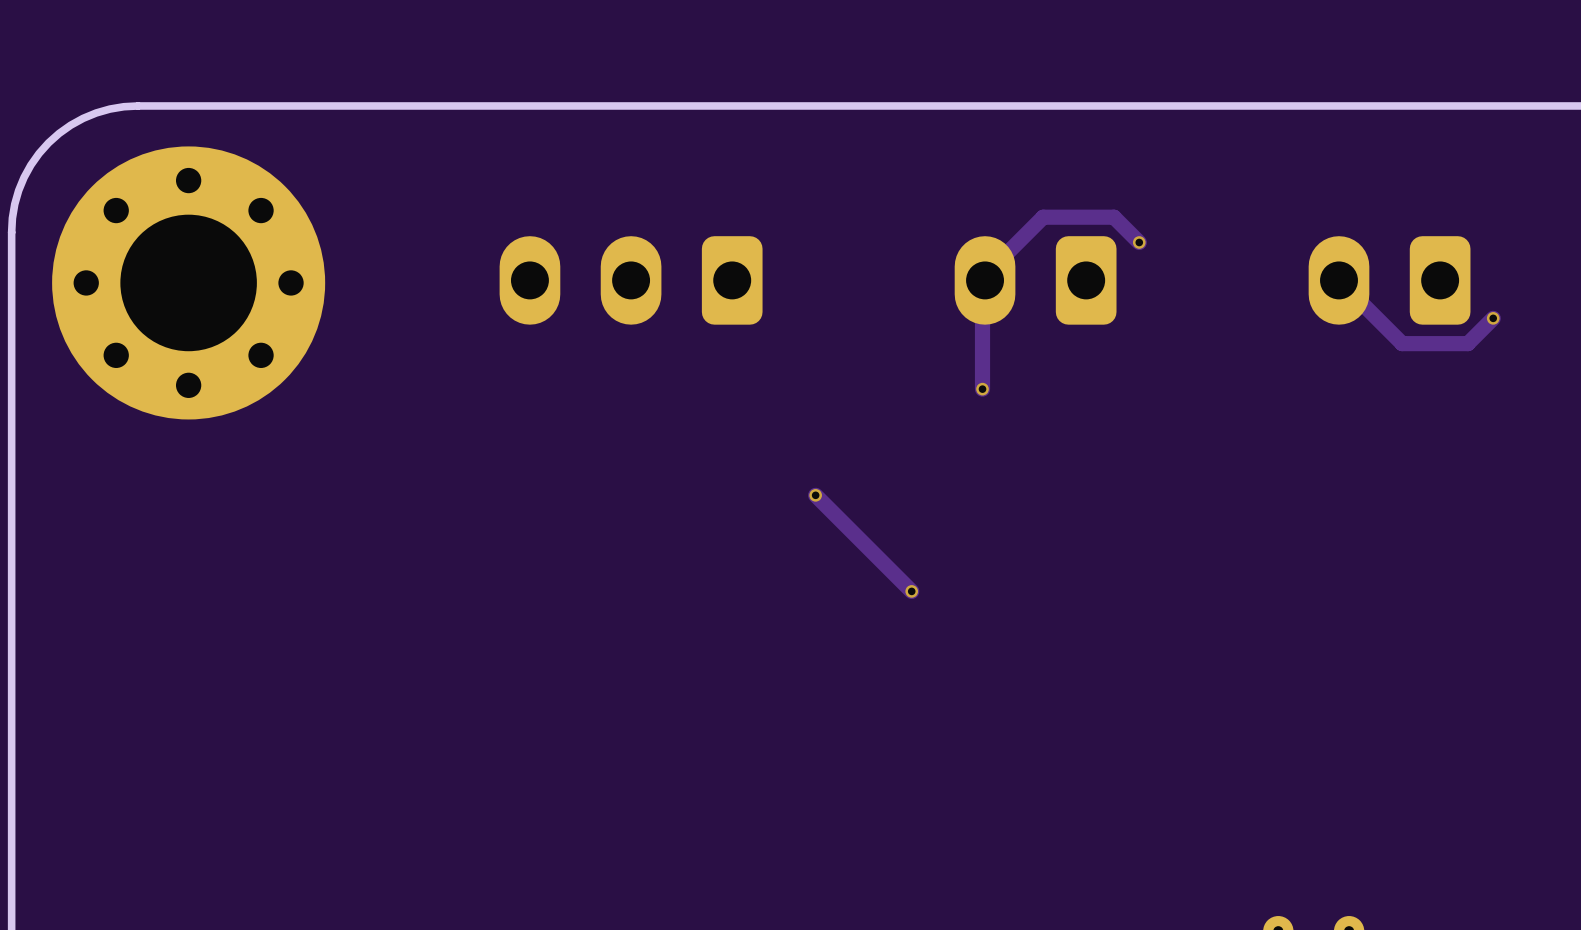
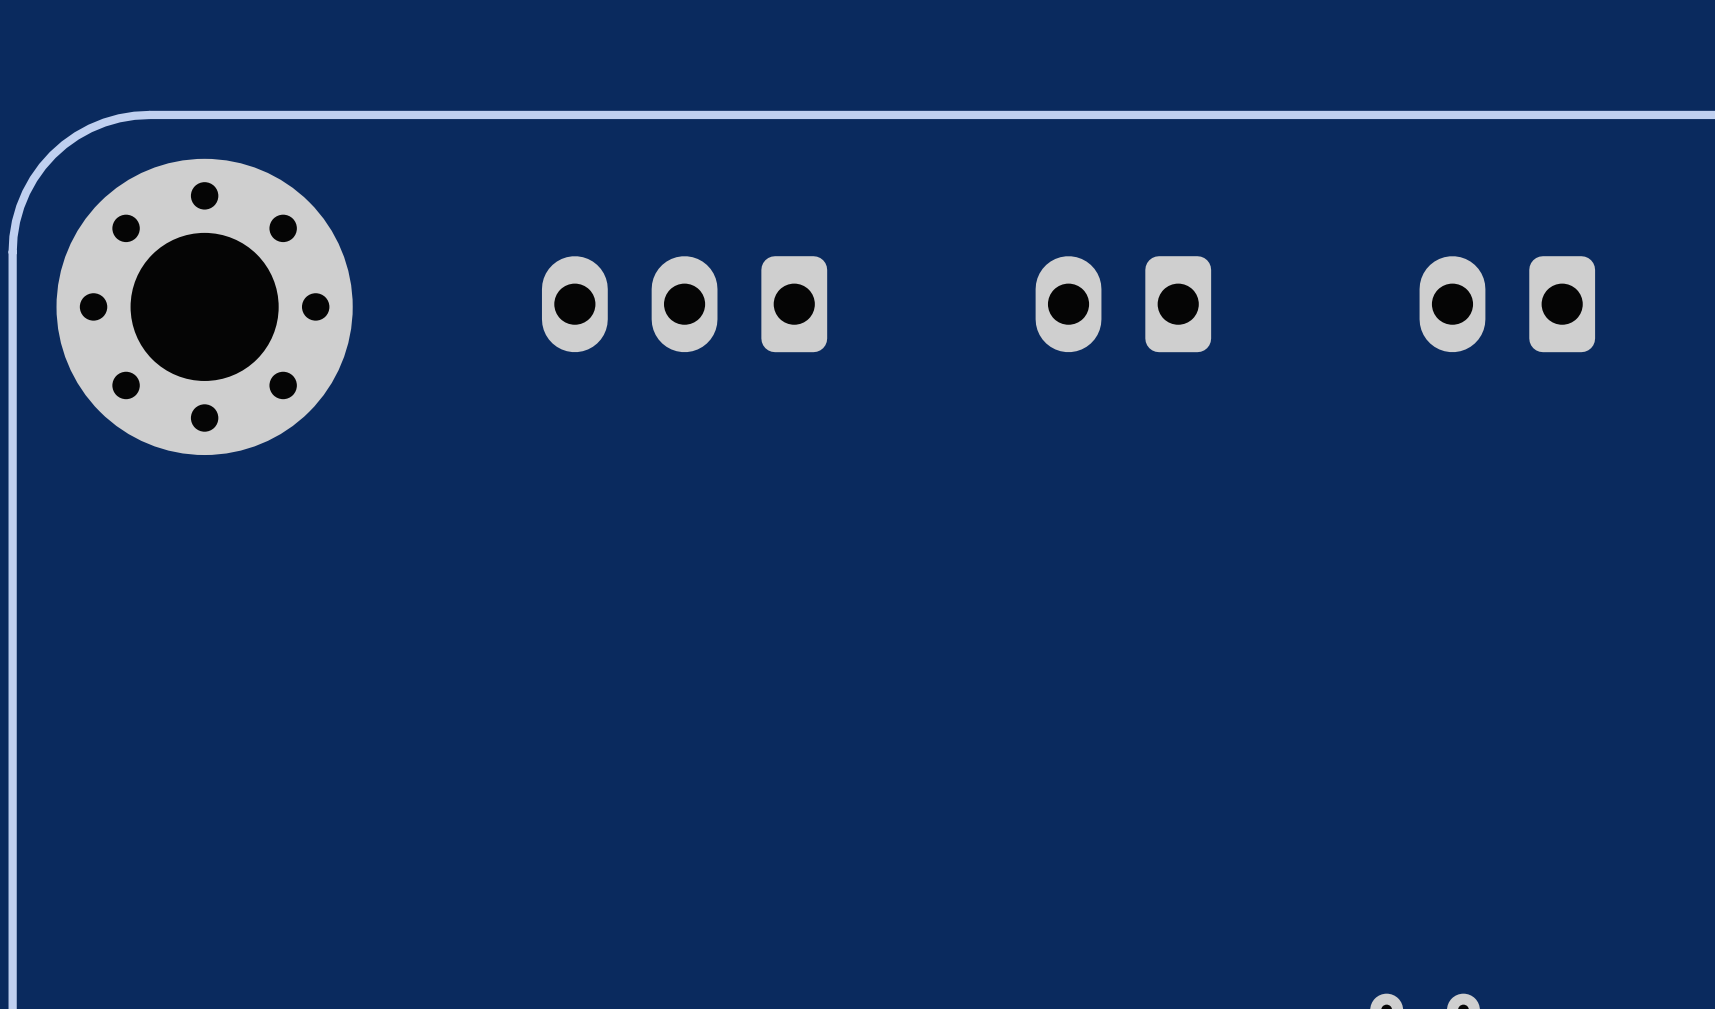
track: (1139, 242) (1113, 217) (1043, 217) (982, 277) (982, 389) -> none
via: (1139, 242) -> none
track: (1336, 277) (1402, 343) (1467, 343) (1493, 318) -> none
via: (1493, 318) -> none
via: (982, 389) -> none
track: (815, 495) (911, 591) -> none
via: (815, 495) -> none
via: (911, 591) -> none

